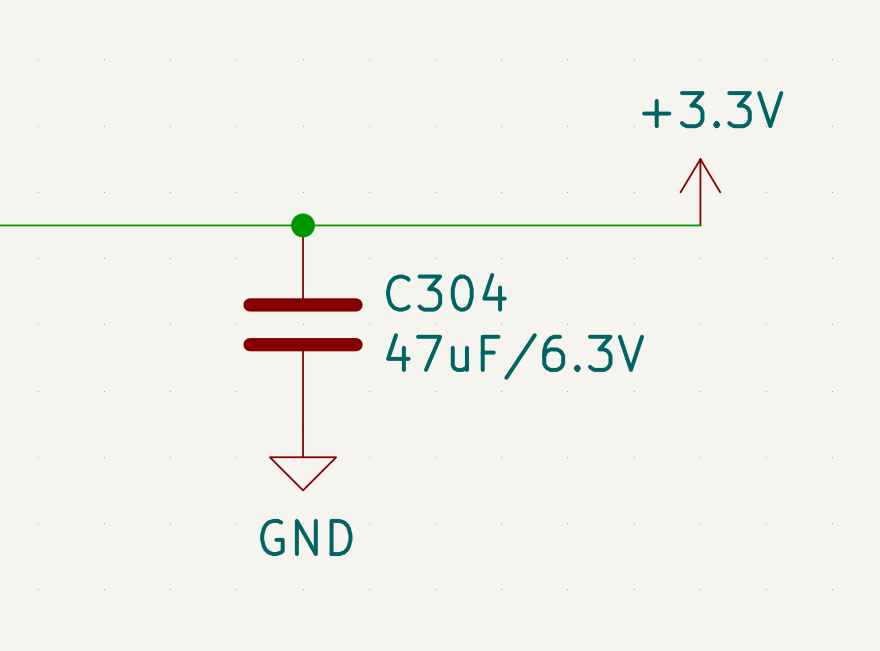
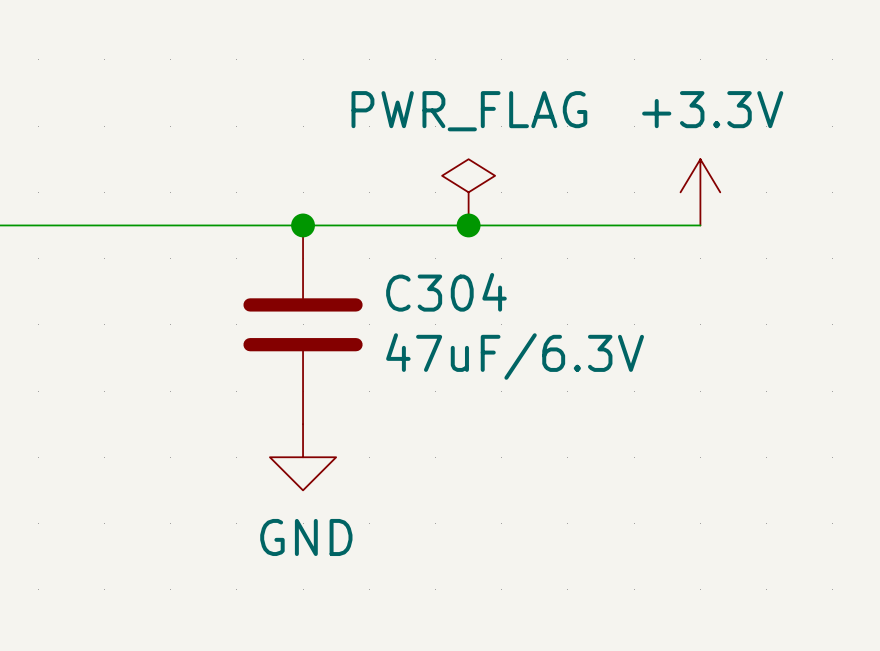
power symbol: none -> PWR_FLAG (468, 192)
junction: none -> (468, 225)

